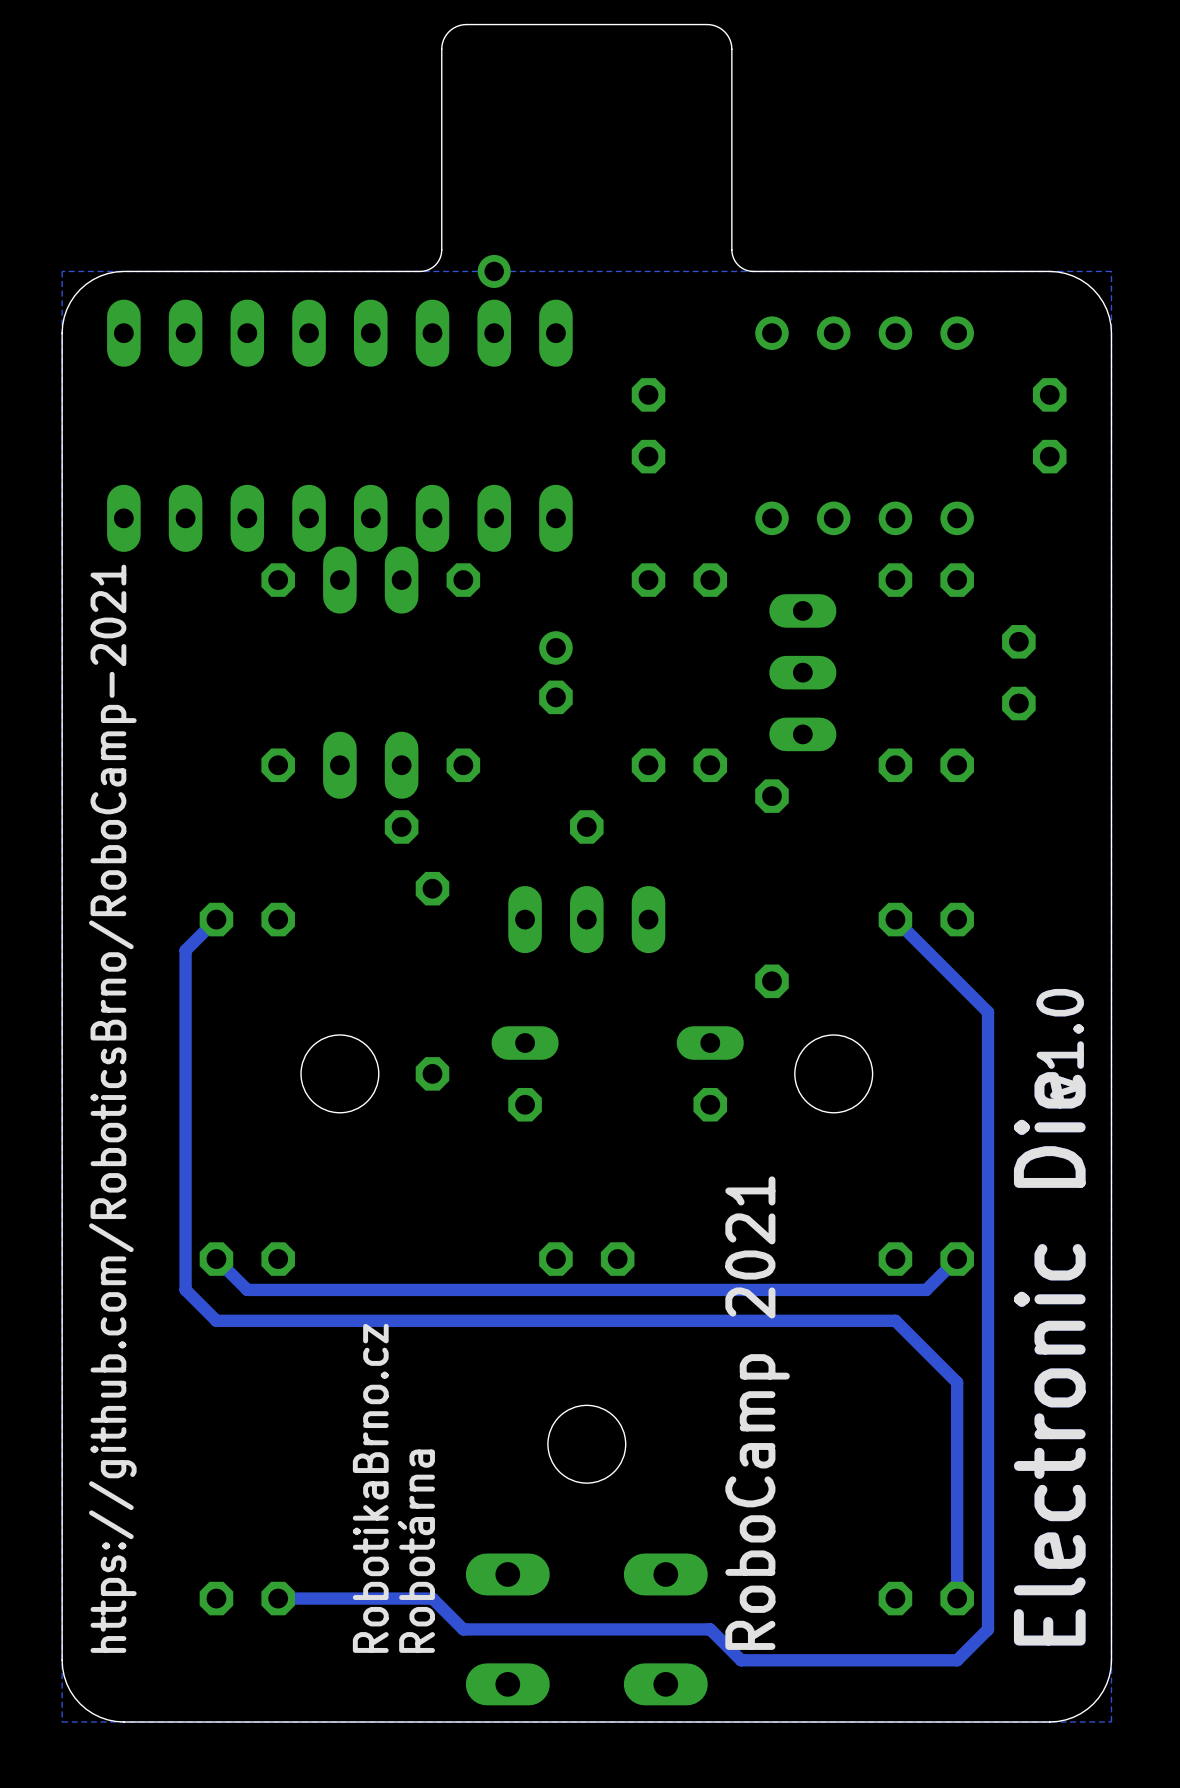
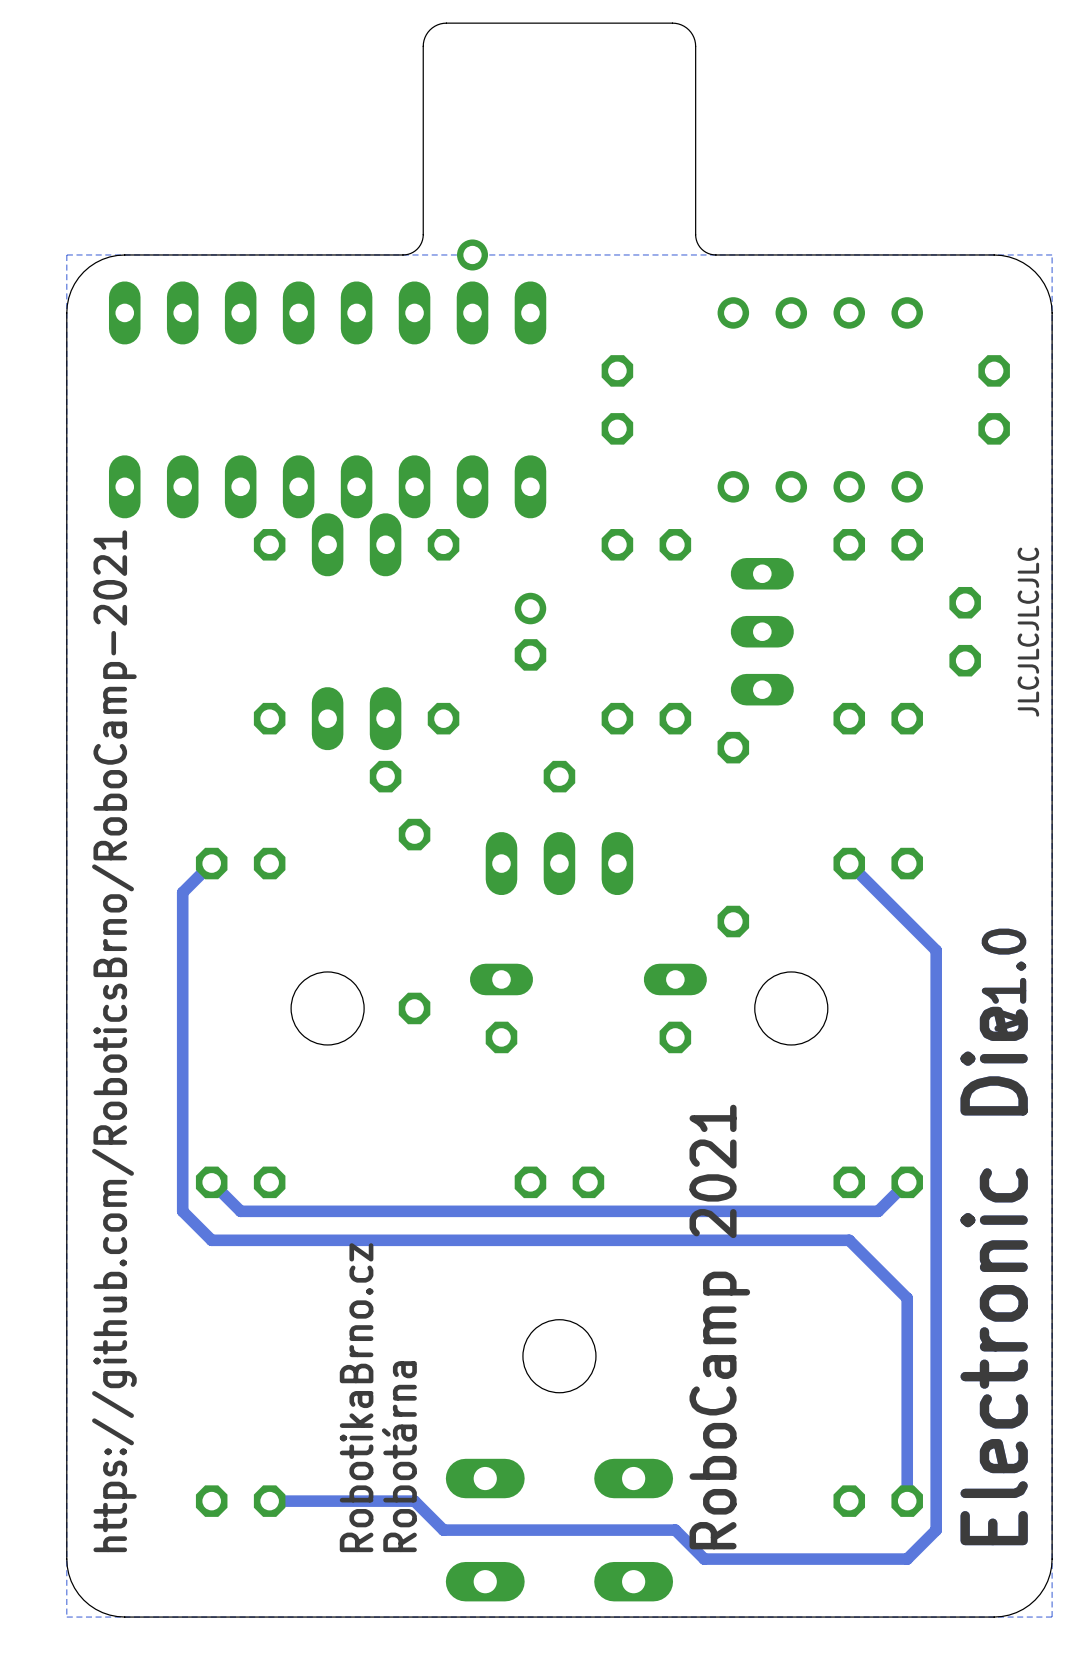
text: none -> JLCJLCJLCJLC (1028, 632)

